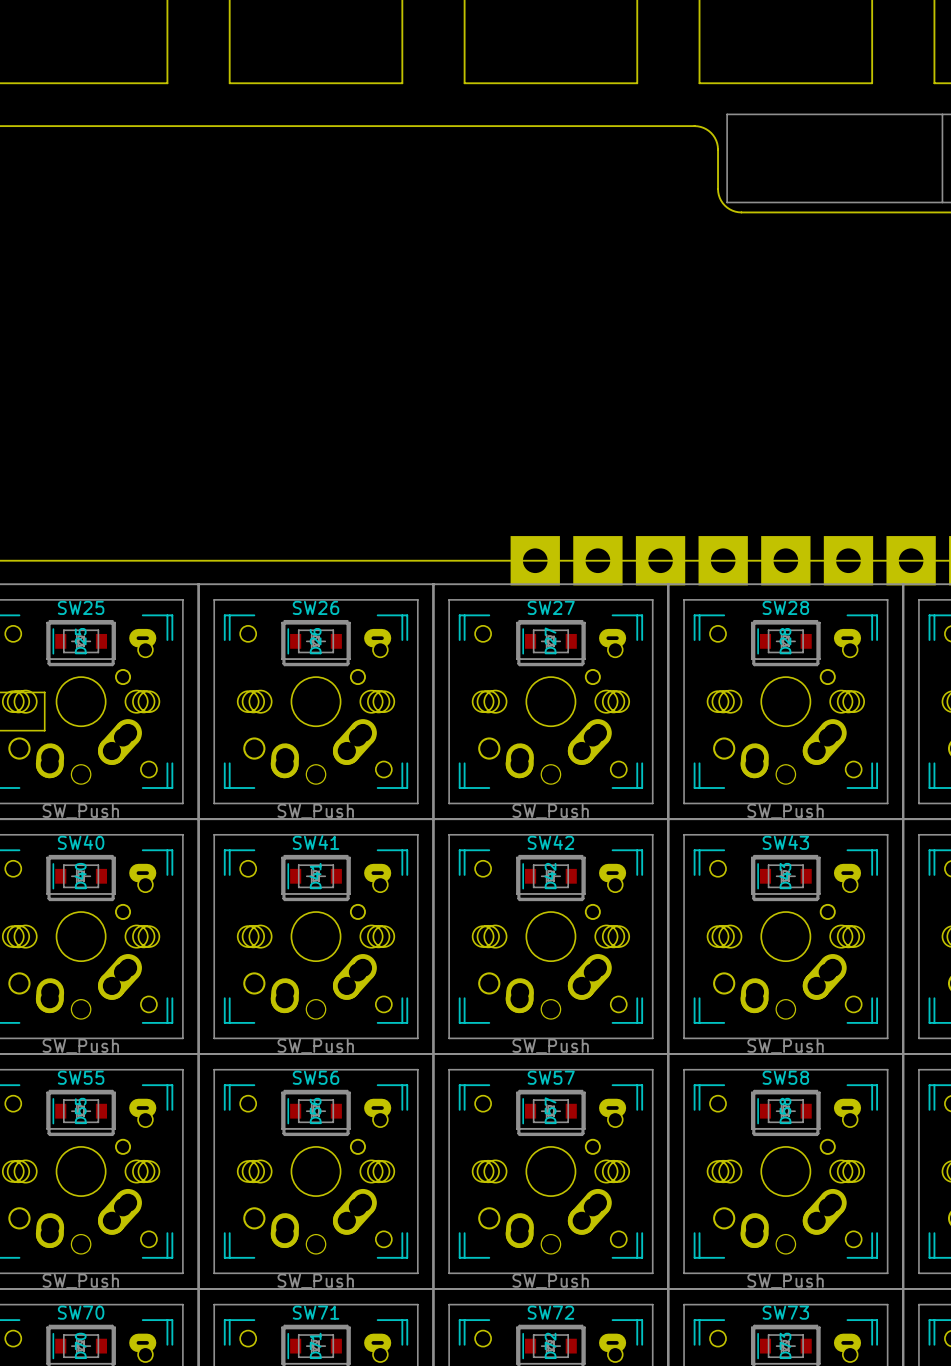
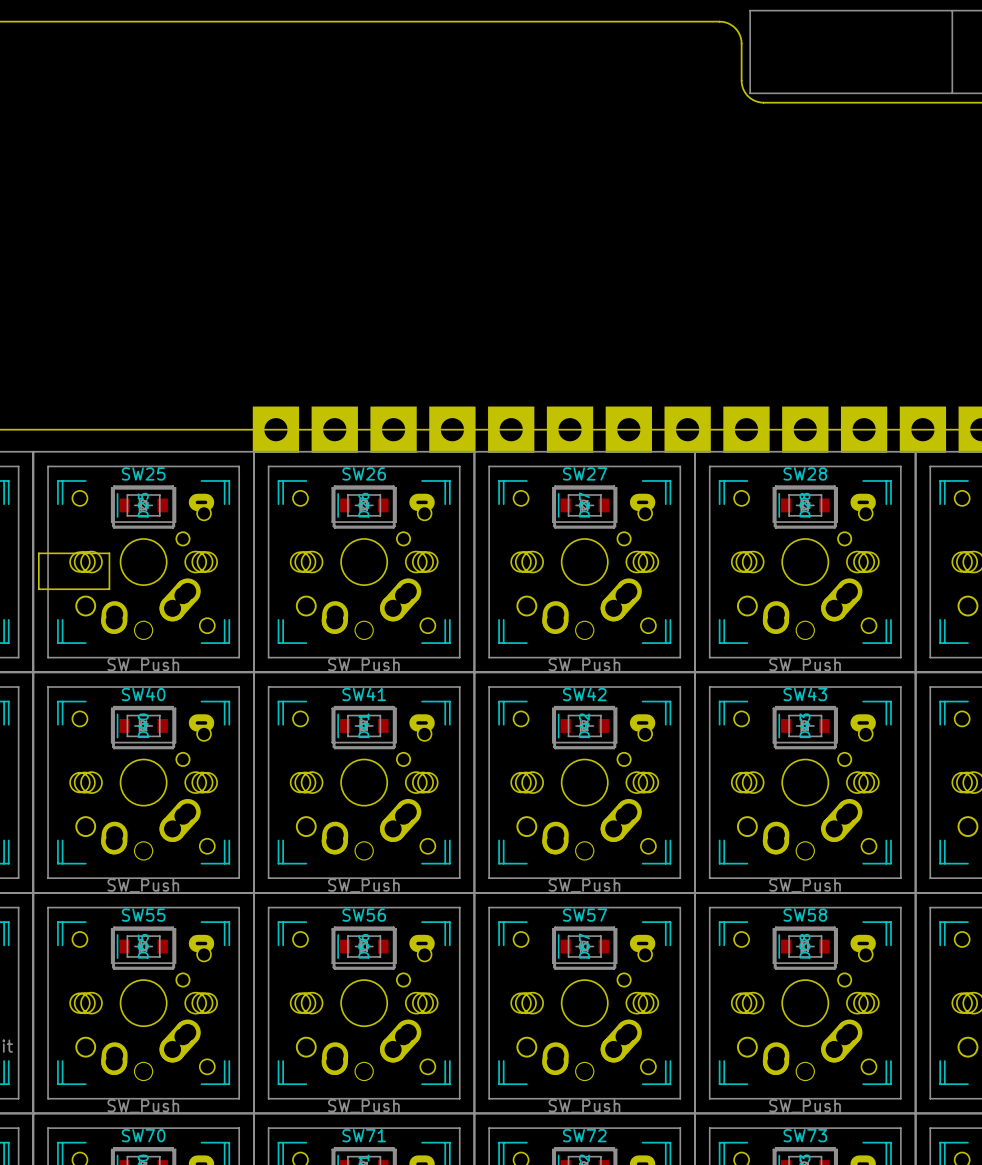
part: none -> (275, 429)
part: none -> (334, 429)
part: none -> (393, 429)
part: none -> (452, 429)
part: none -> (511, 429)

